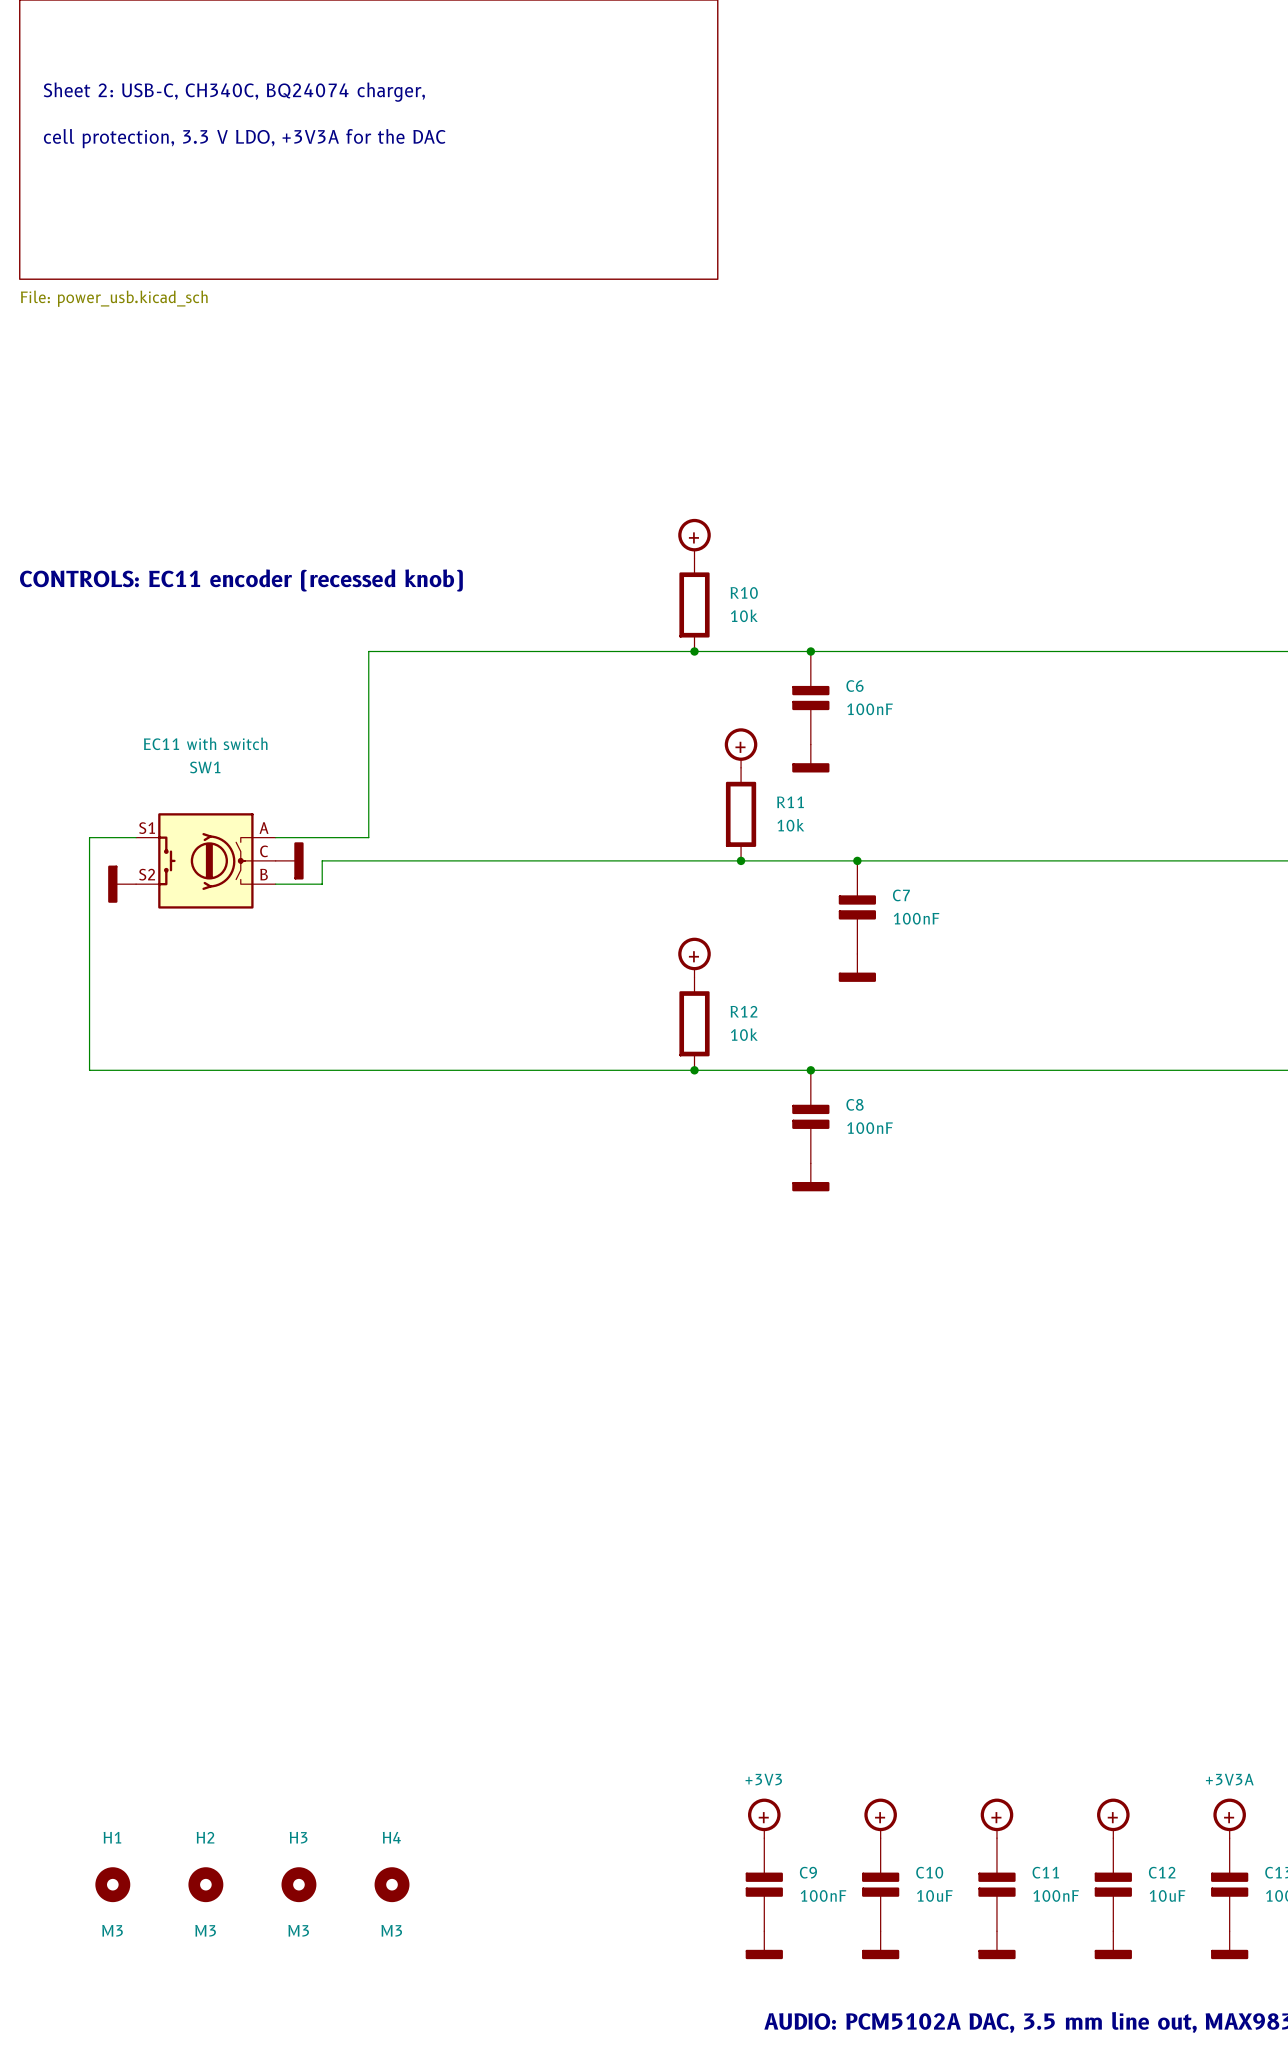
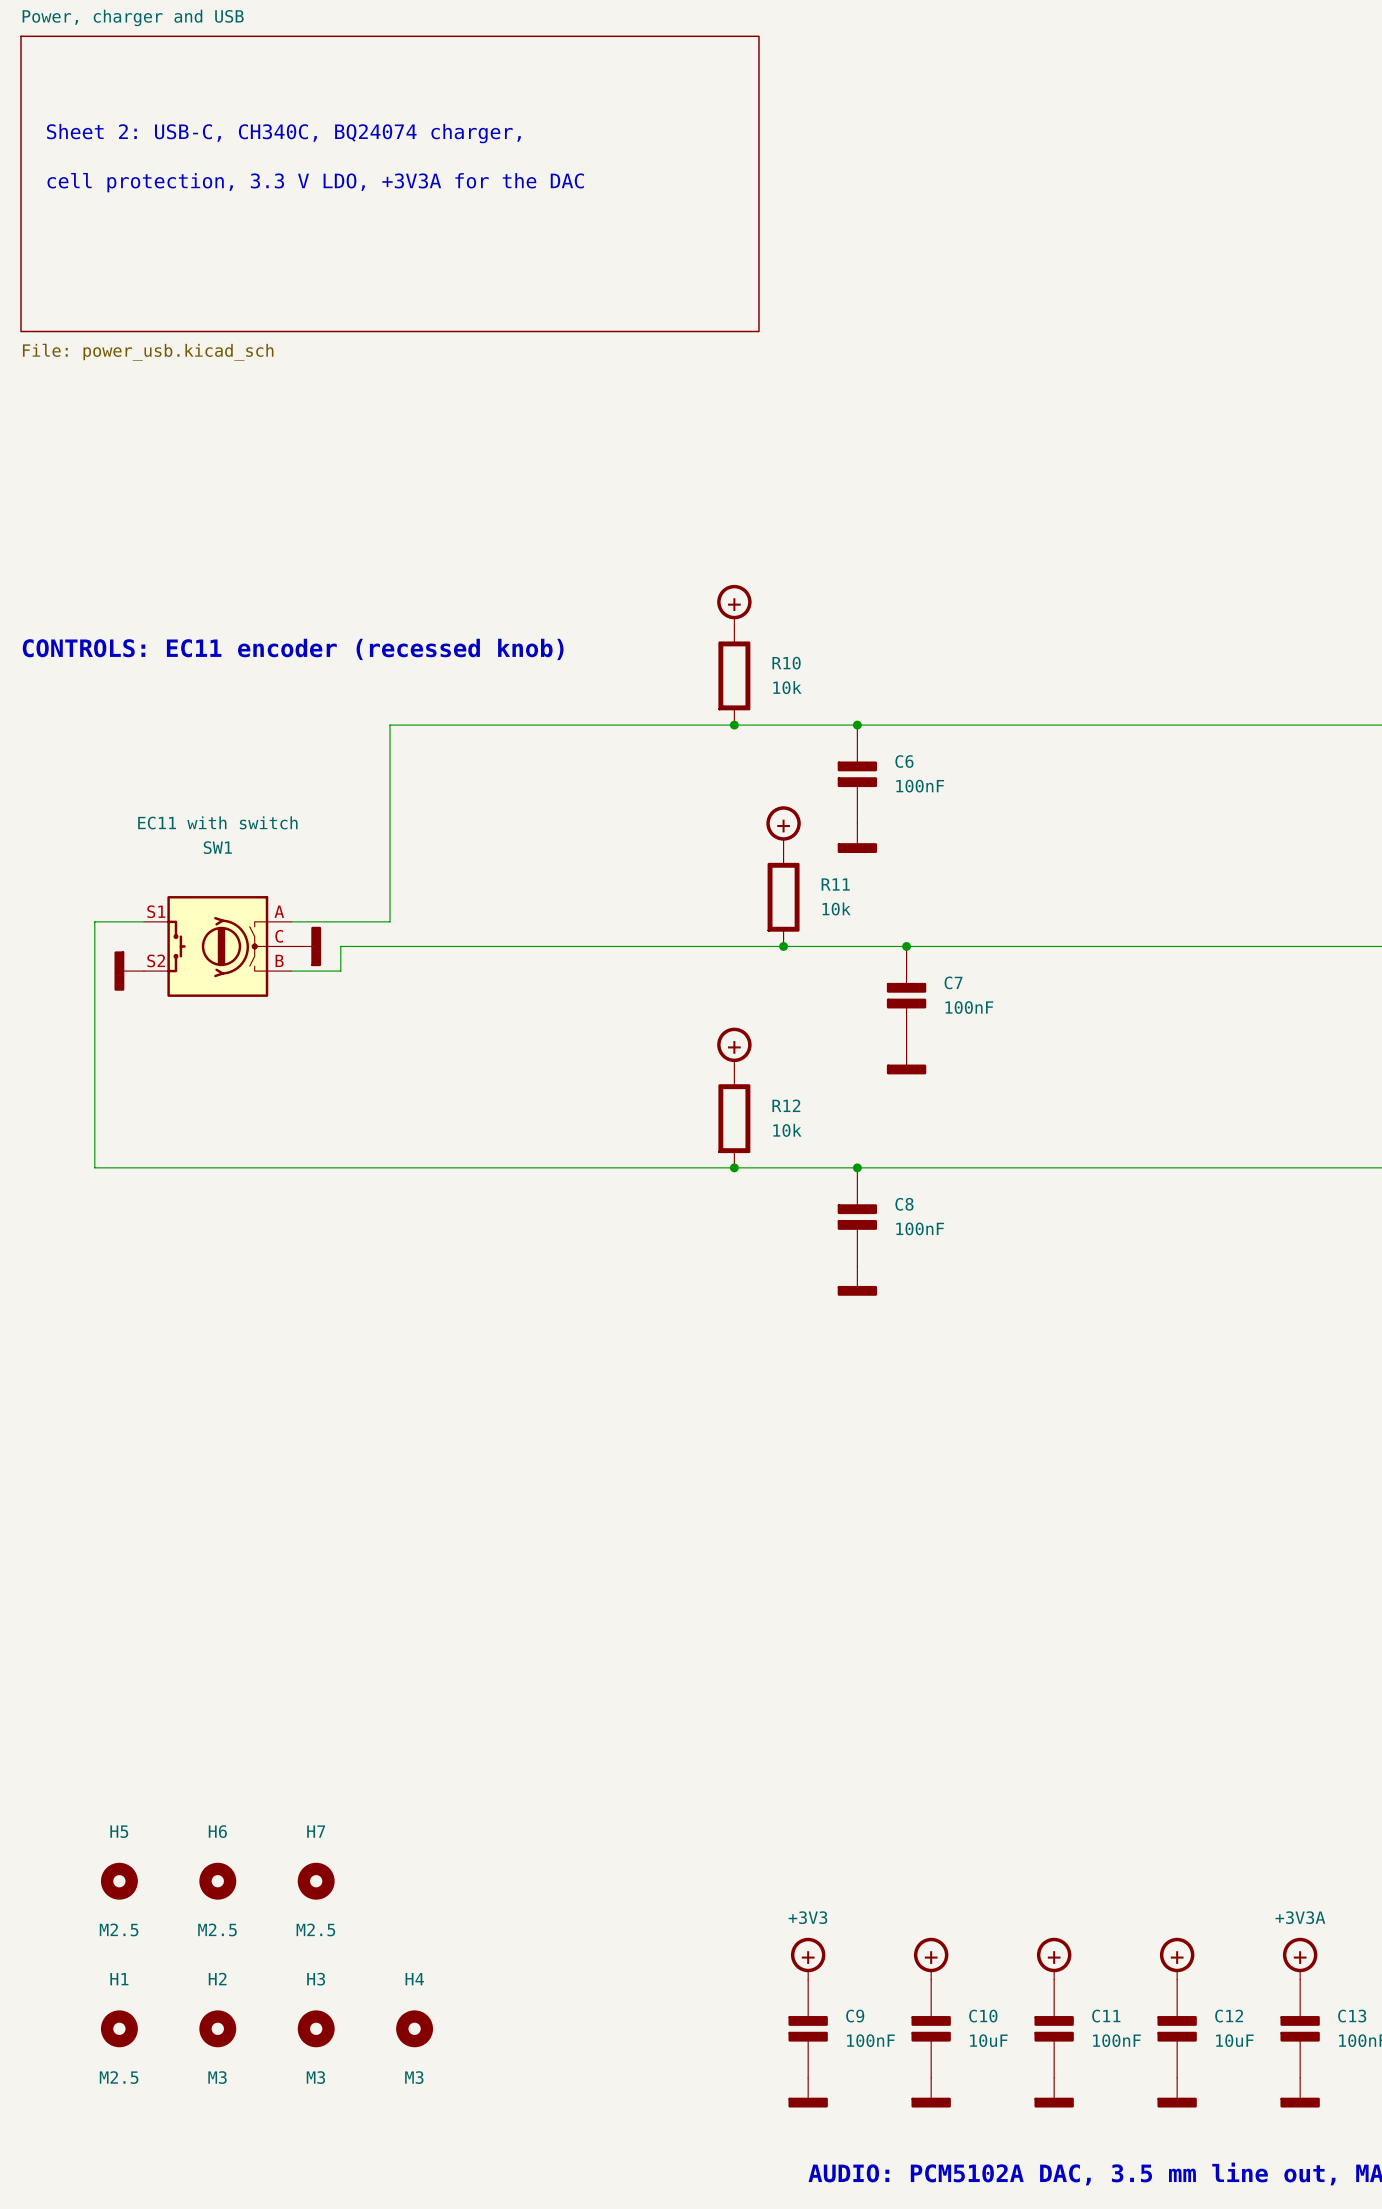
H5: none -> M2.5 (119, 1881)
H6: none -> M2.5 (217, 1881)
H7: none -> M2.5 (316, 1881)
H1 value: M3 (112, 1930) -> M2.5 (119, 2077)

